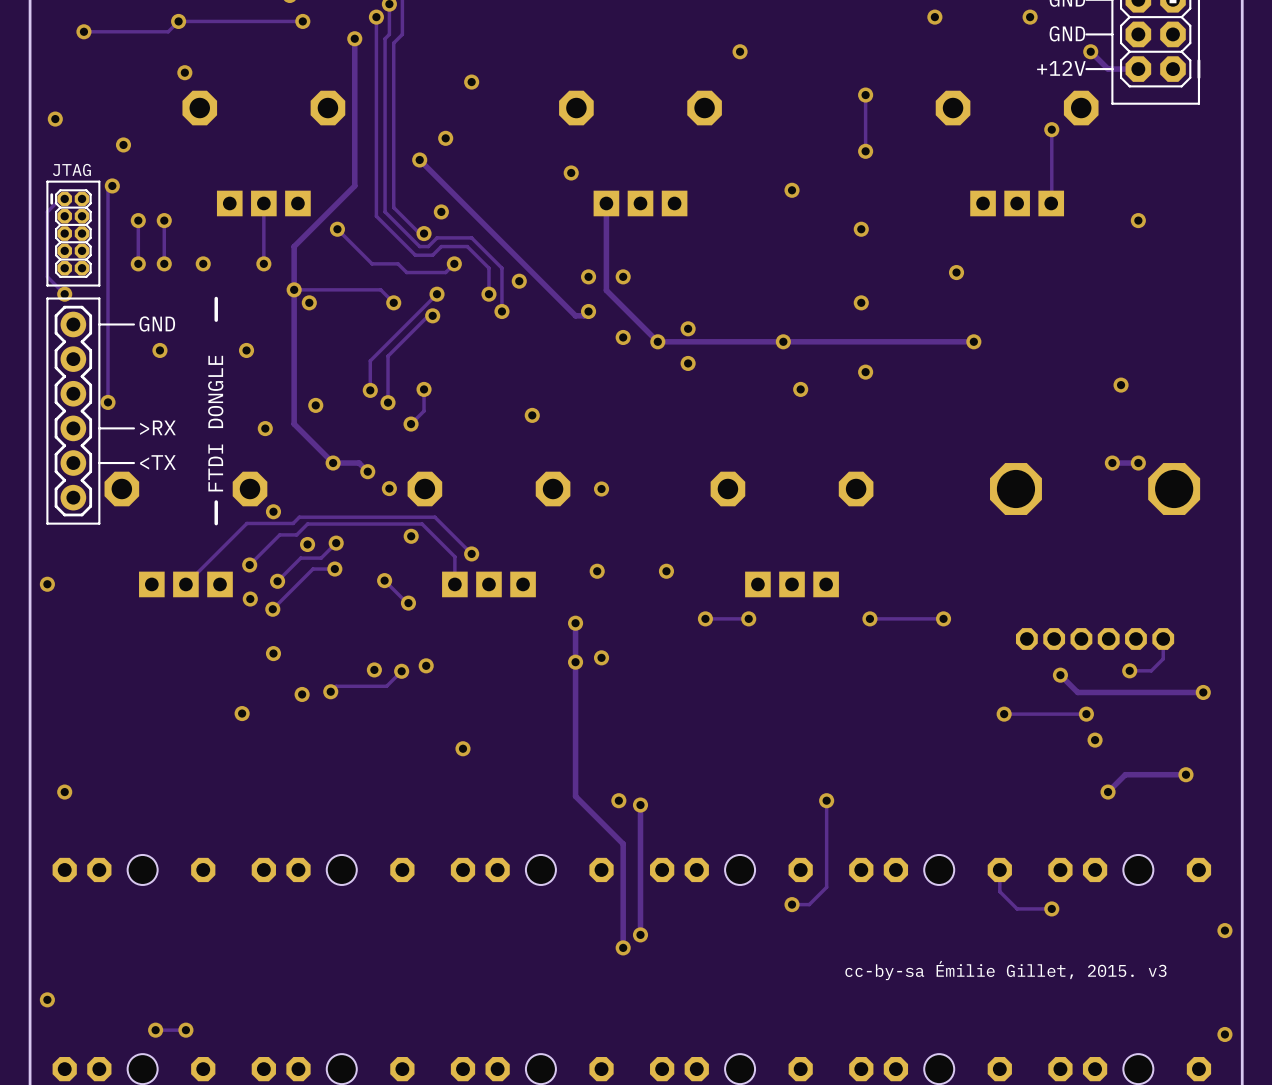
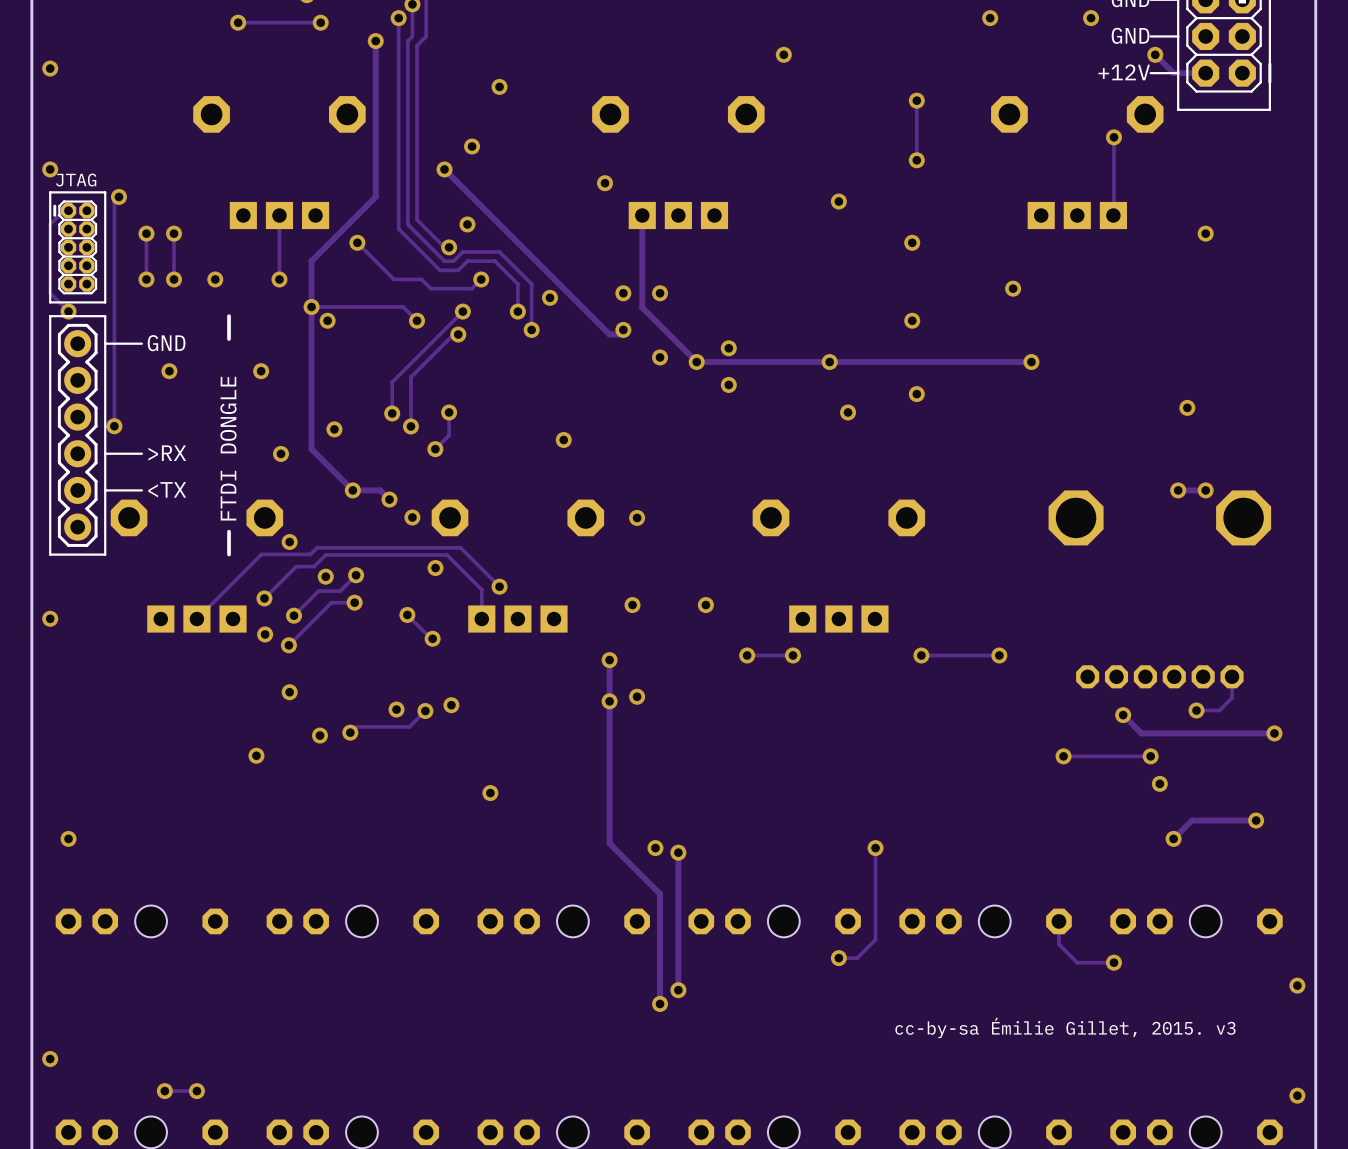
via: (178, 21) -> none
track: (224, 21) (178, 21) (168, 31) (83, 31) -> none
via: none -> (238, 22)
via: (83, 31) -> none
via: none -> (50, 68)
via: (184, 72) -> none
via: (55, 119) -> none
via: (123, 144) -> none
via: none -> (50, 169)

